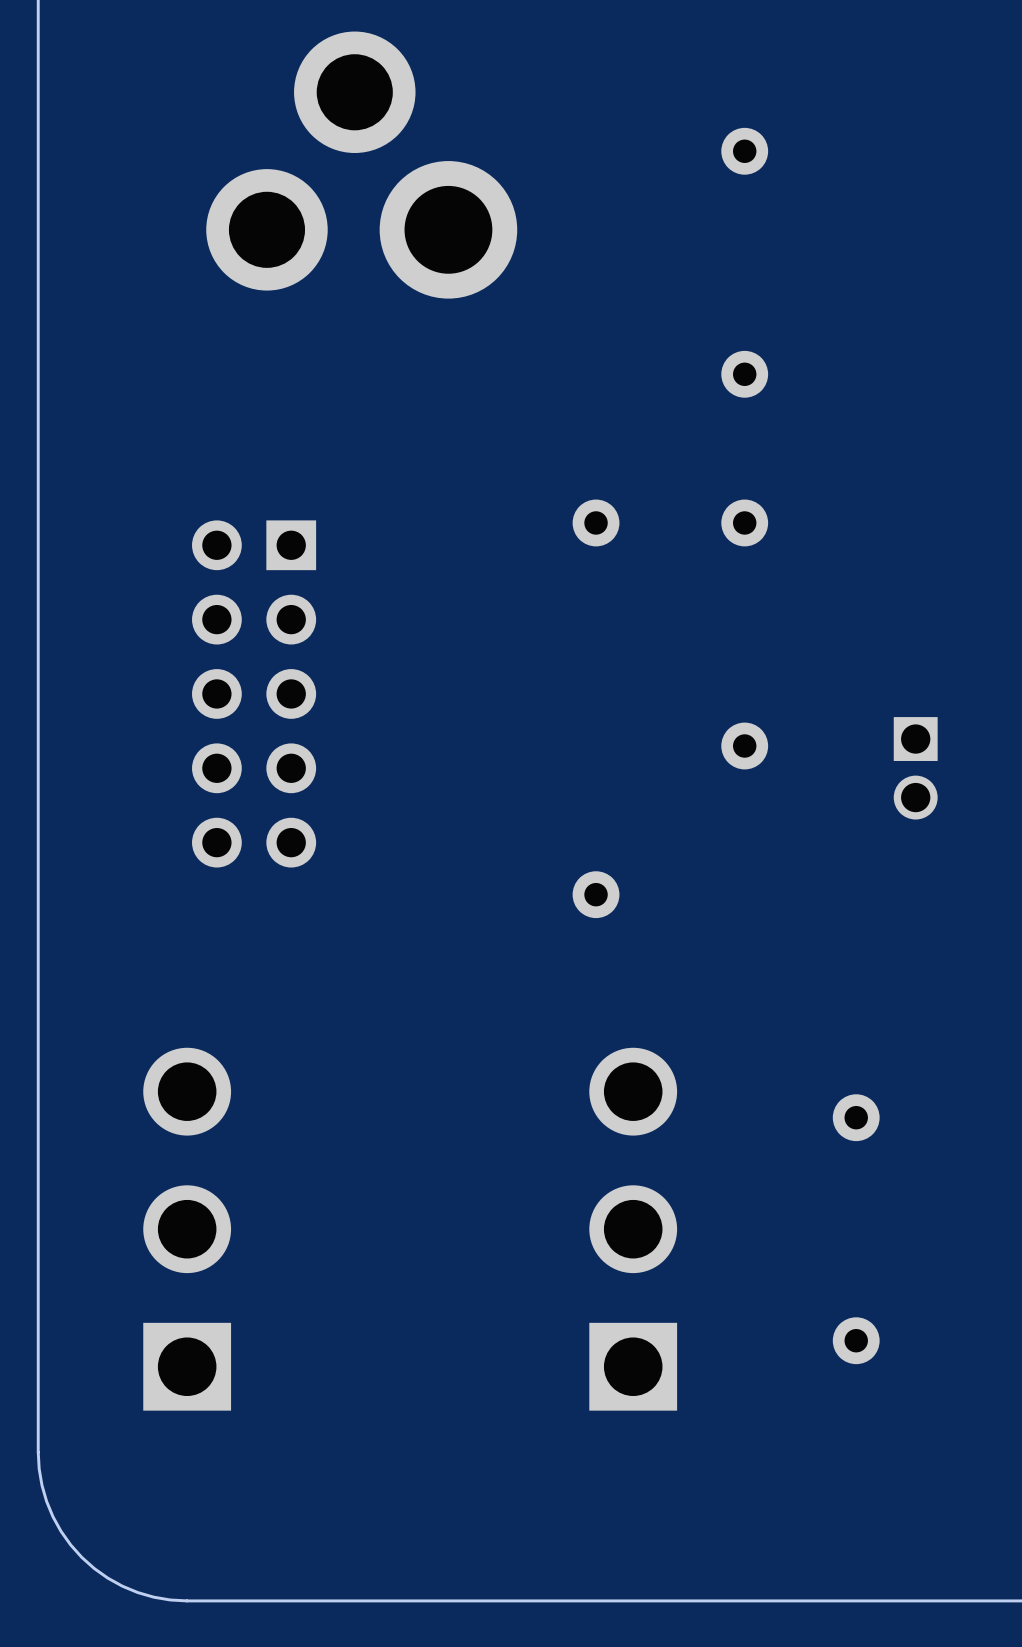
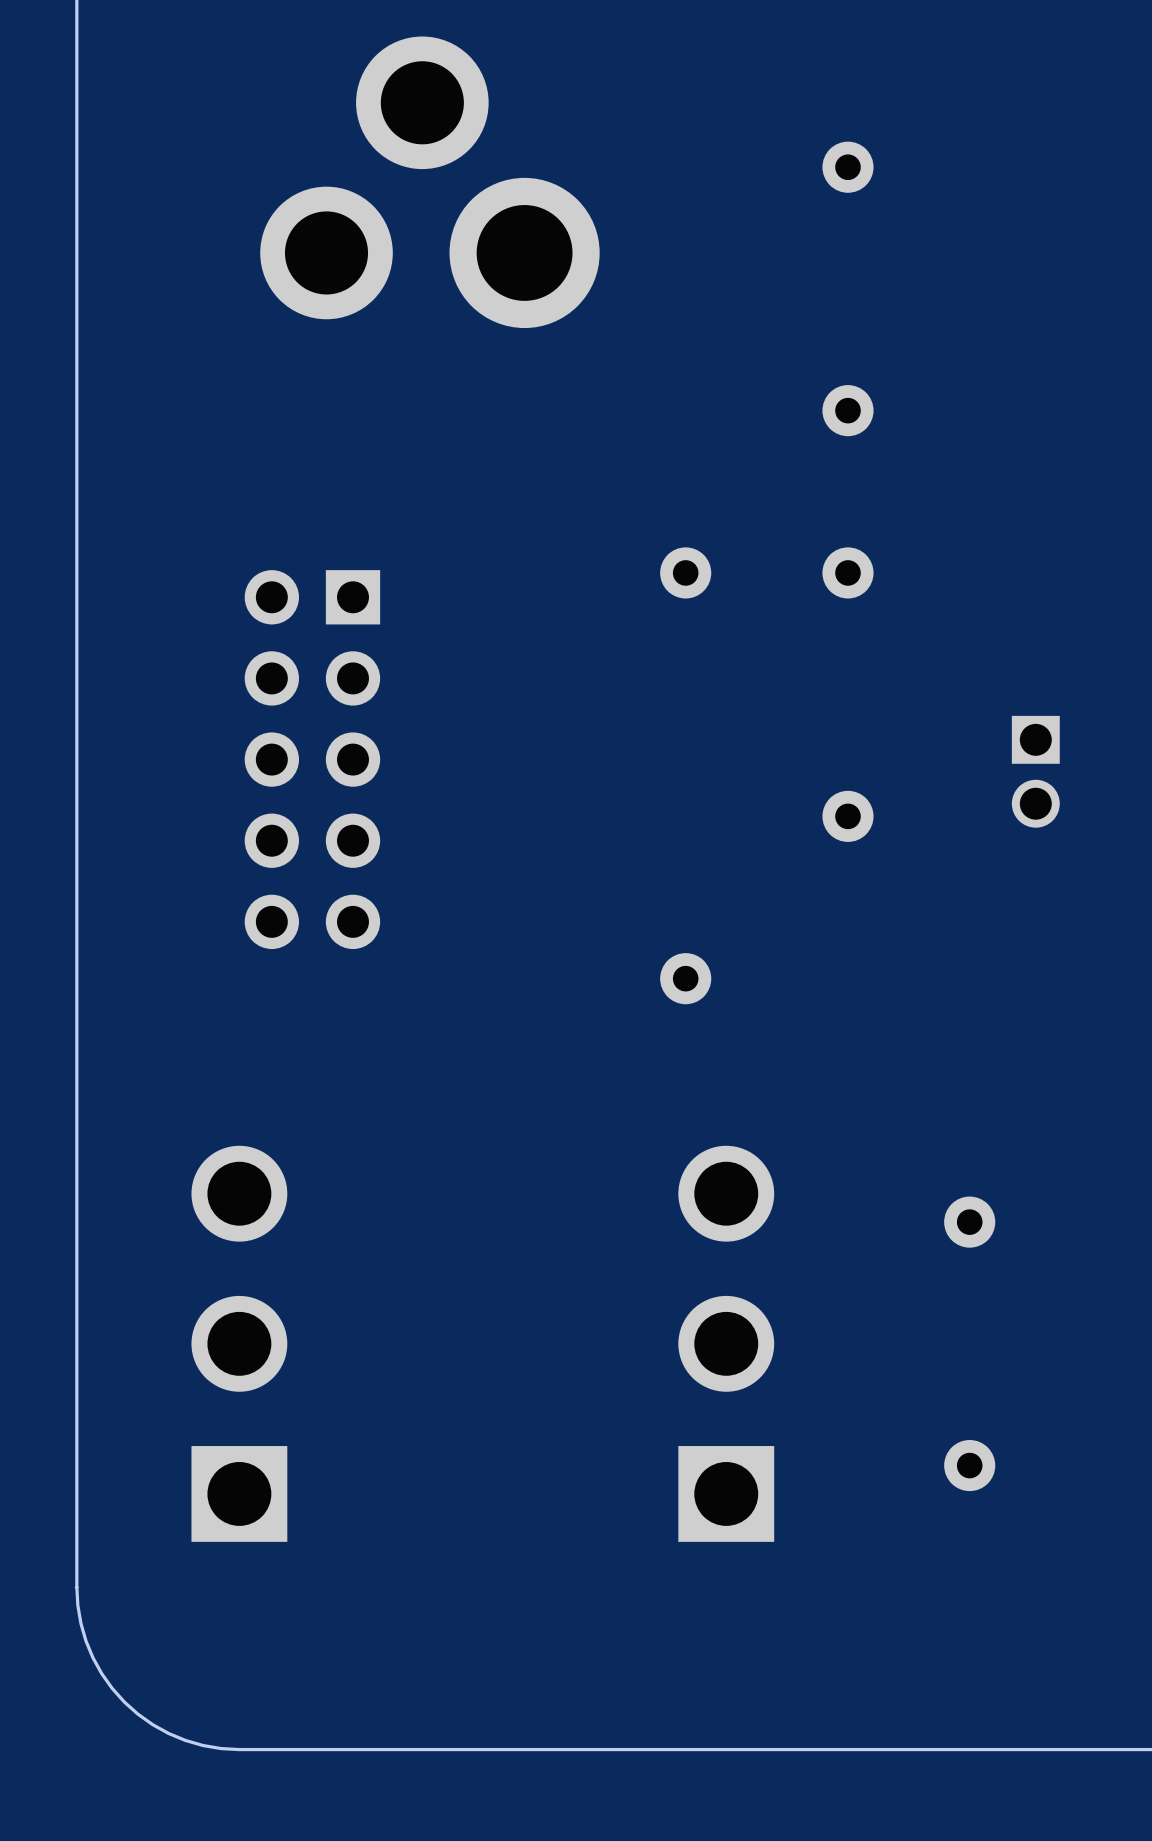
part position: (915, 768) -> (1035, 771)

